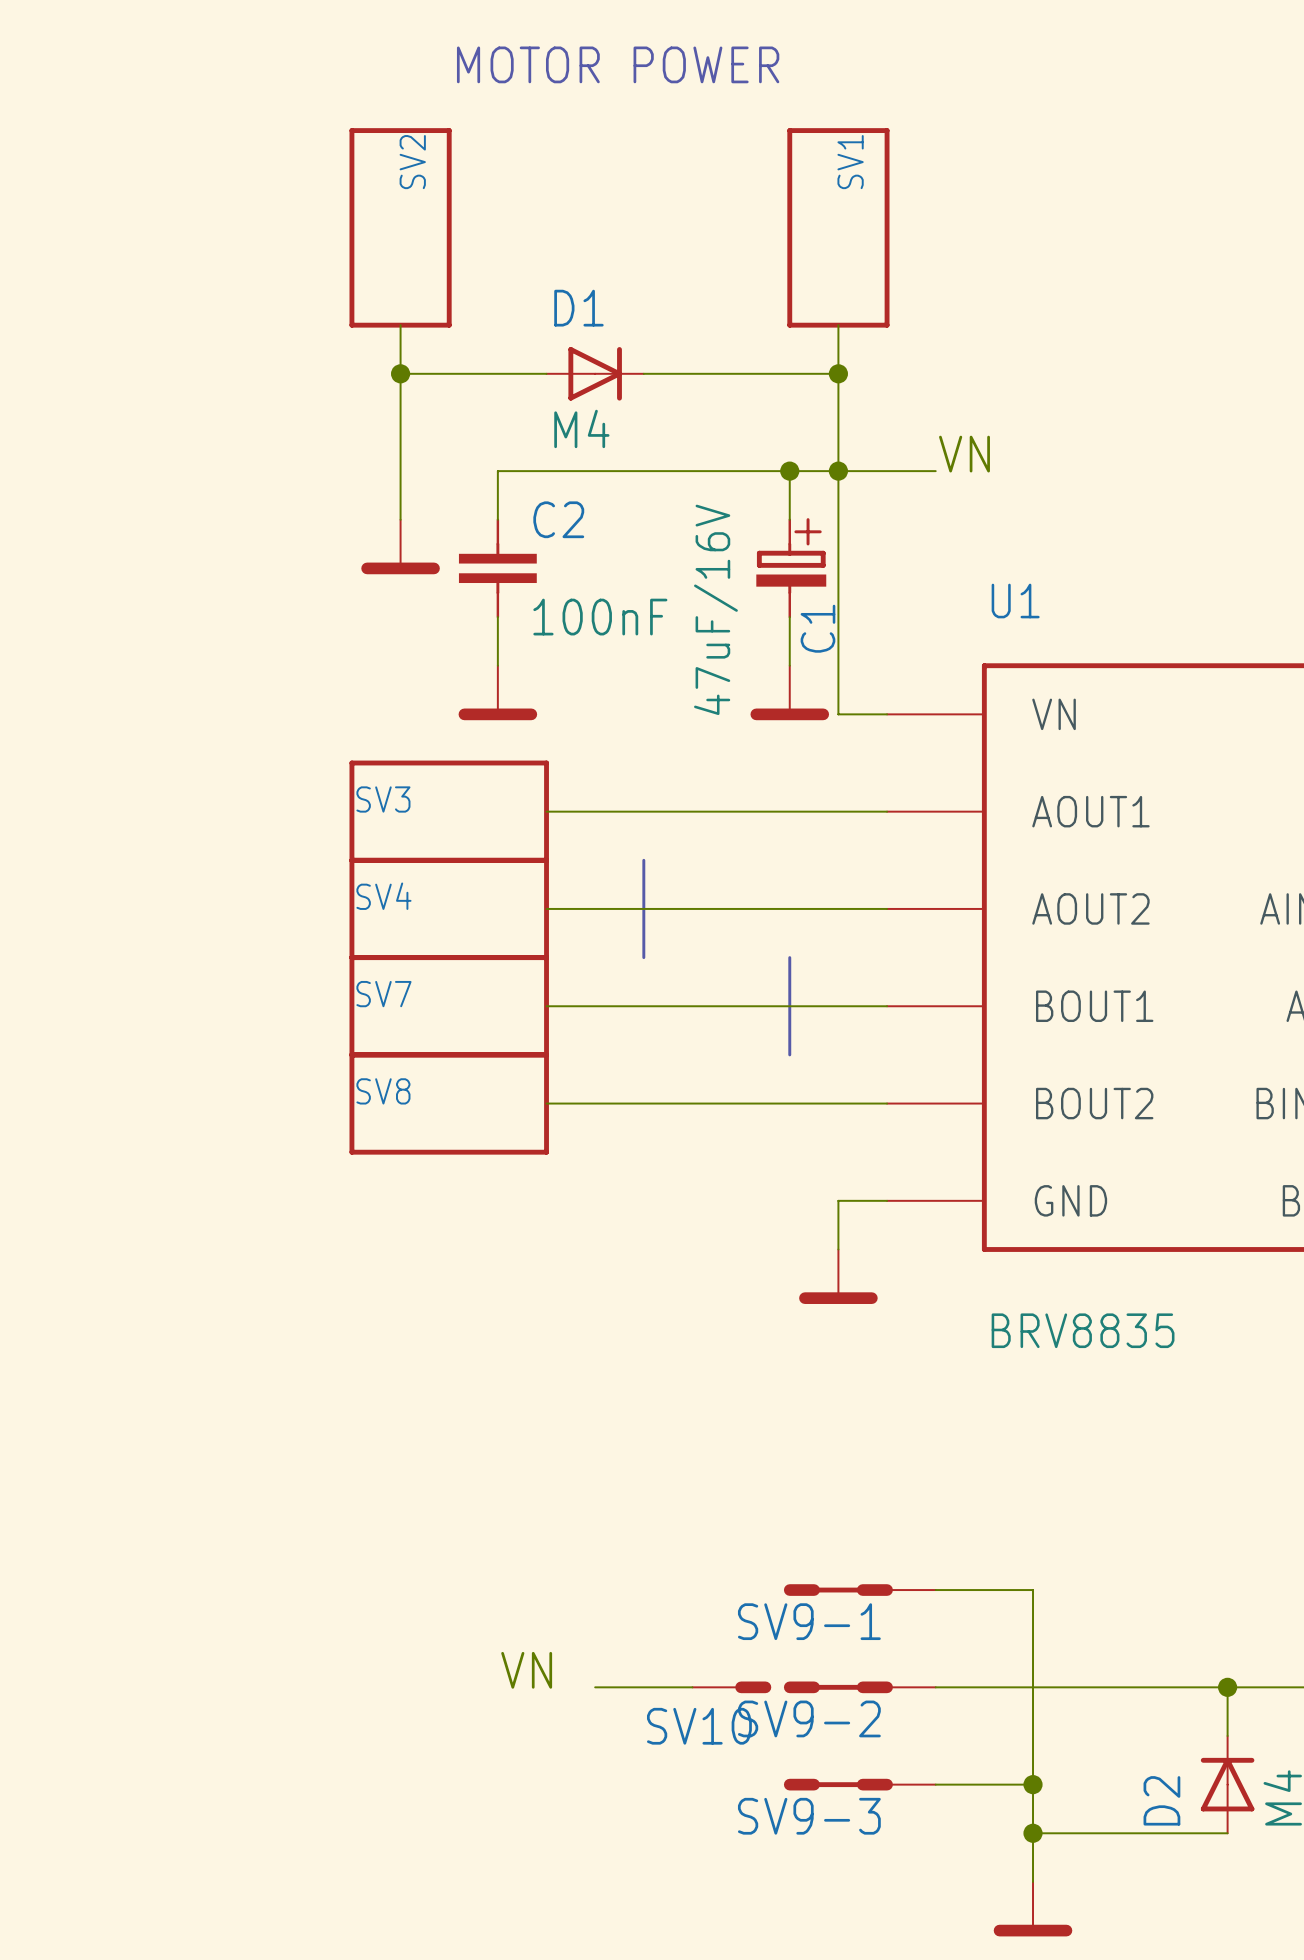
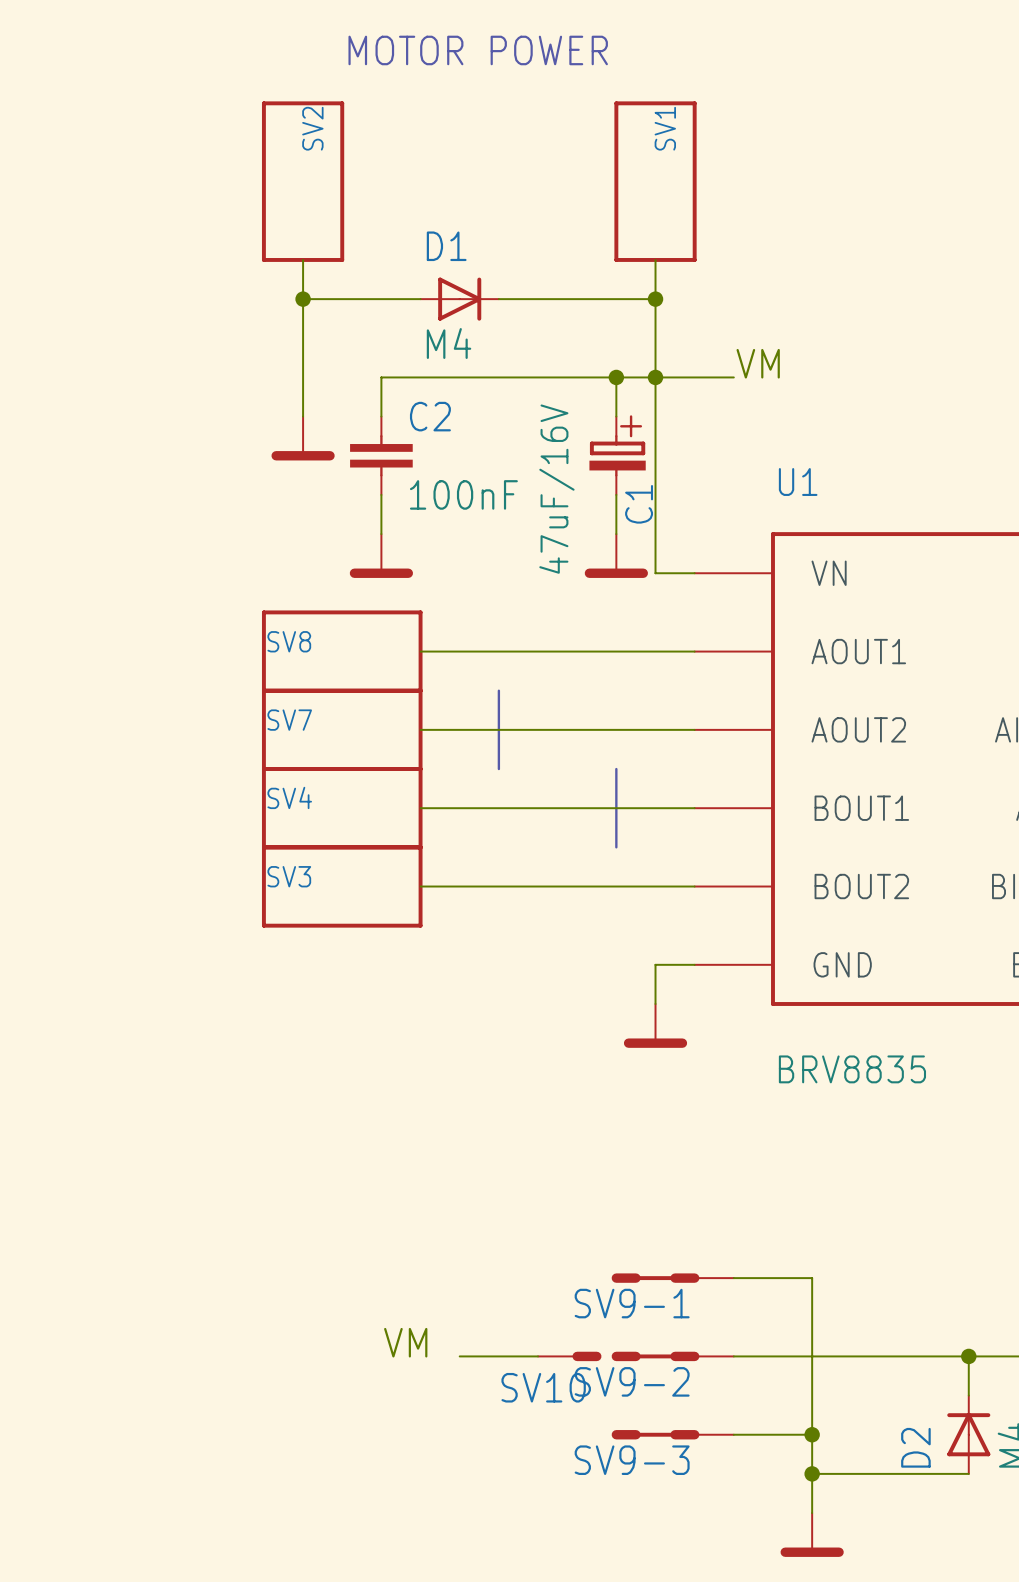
text: VN (964, 454) -> VM (758, 363)
SV3 name: SV3 (383, 799) -> SV8 (289, 641)
SV4 name: SV4 (383, 896) -> SV7 (289, 720)
SV7 name: SV7 (383, 994) -> SV4 (289, 797)
SV8 name: SV8 (383, 1091) -> SV3 (289, 876)
text: VN (526, 1670) -> VM (405, 1342)

